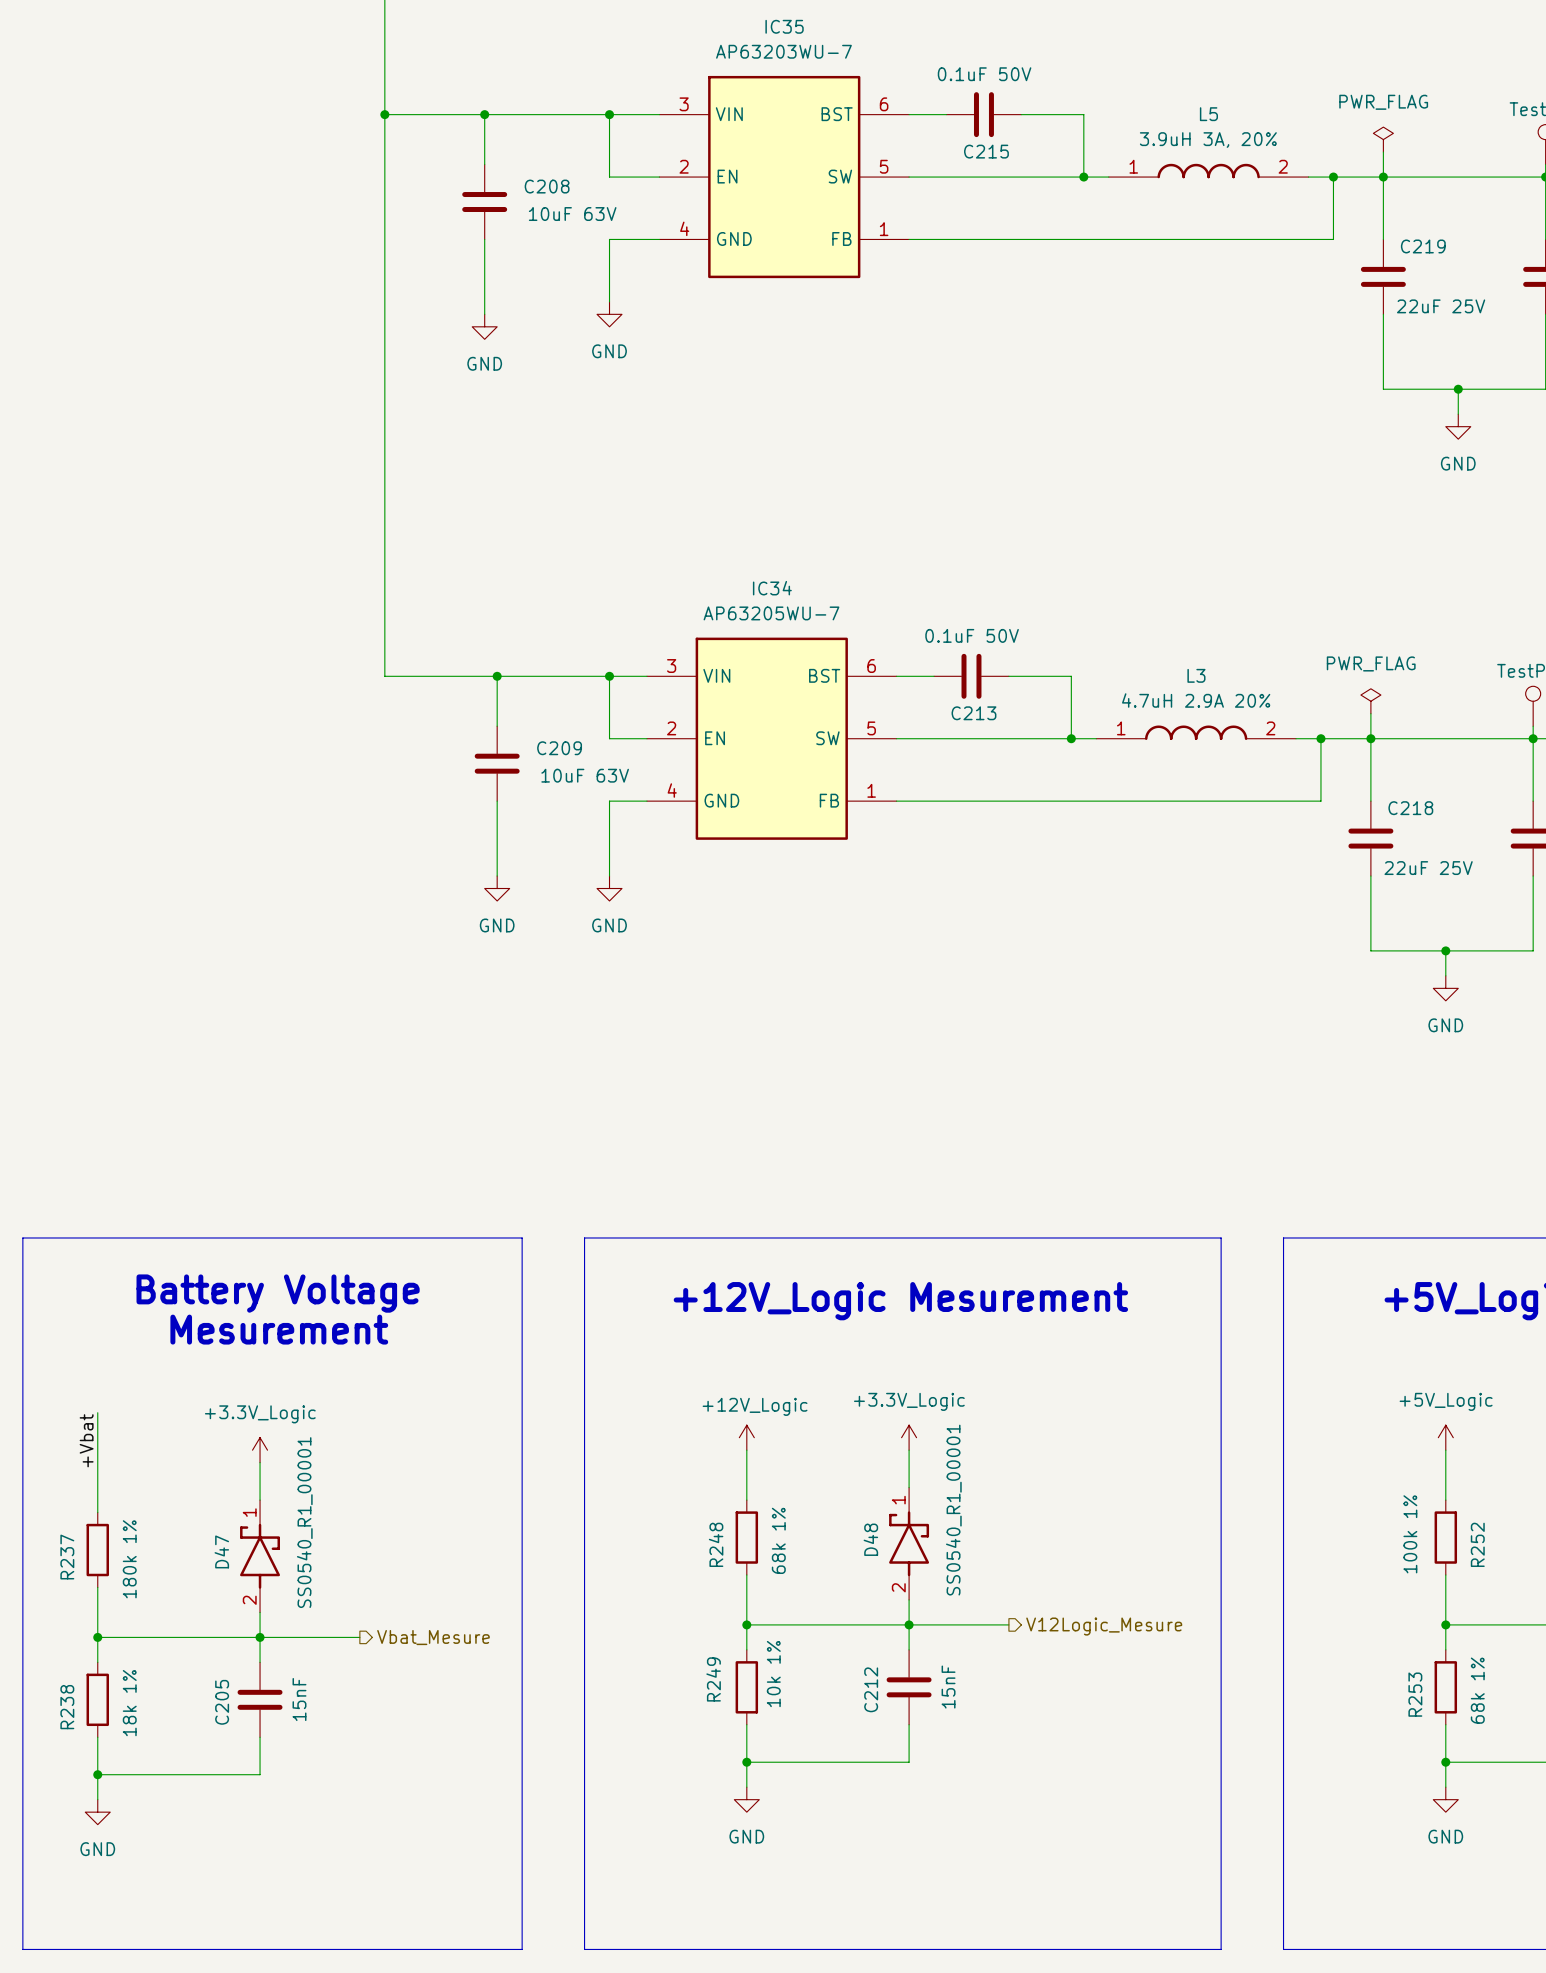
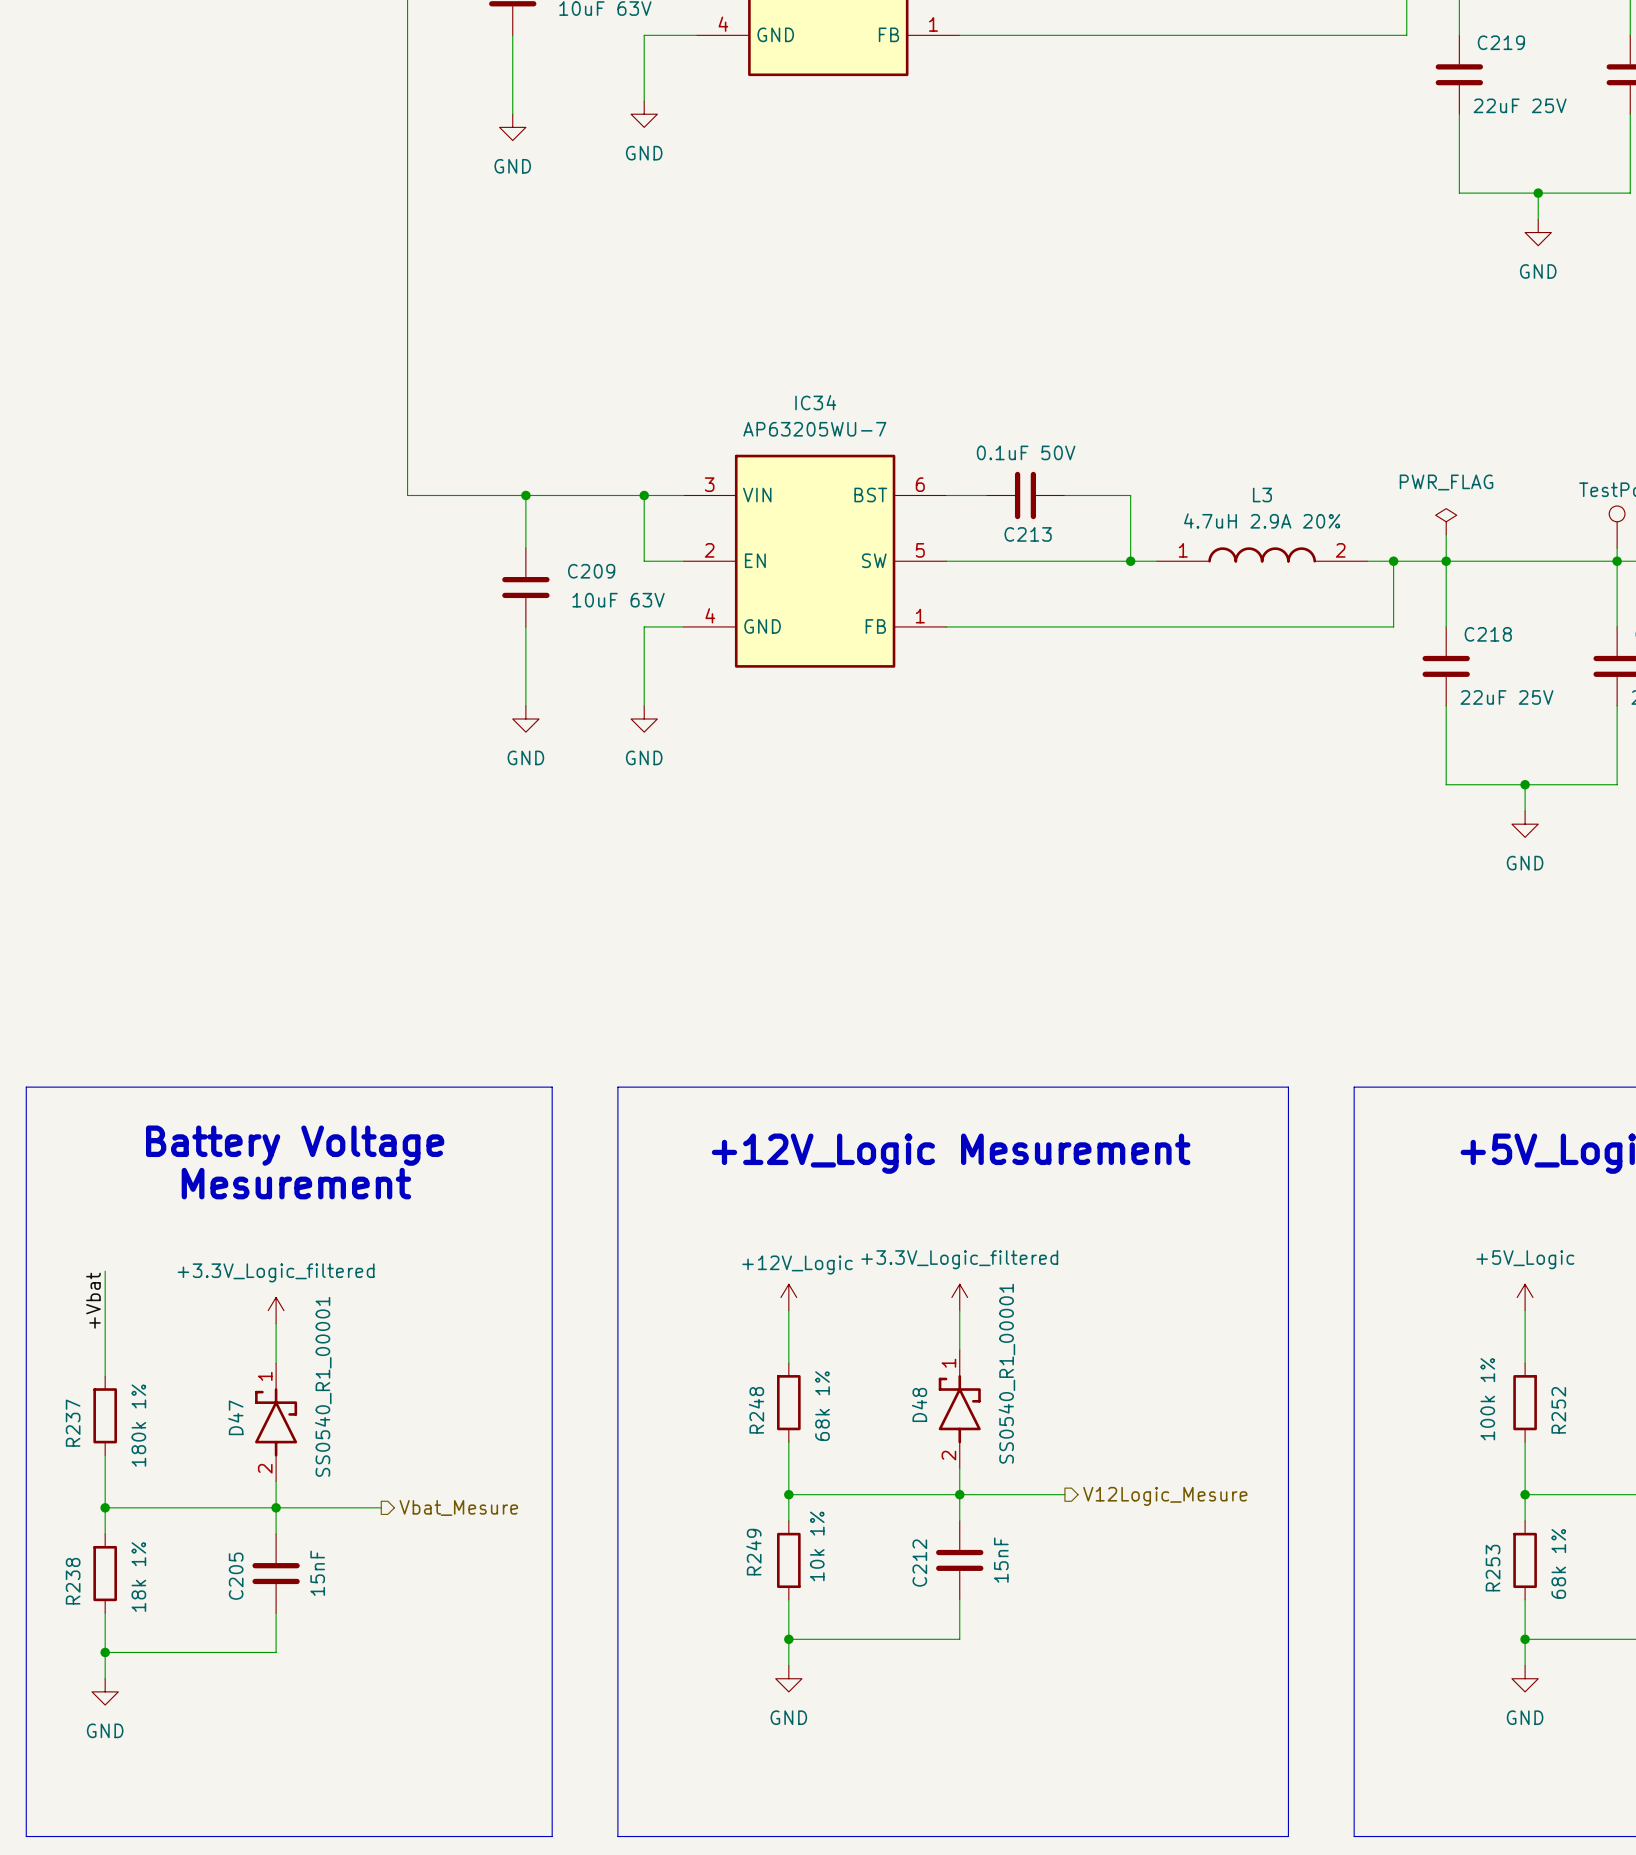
power symbol: +3.3V_Logic (909, 1437) -> +3.3V_Logic_filtered (959, 1297)
power symbol: +3.3V_Logic (260, 1450) -> +3.3V_Logic_filtered (276, 1310)

